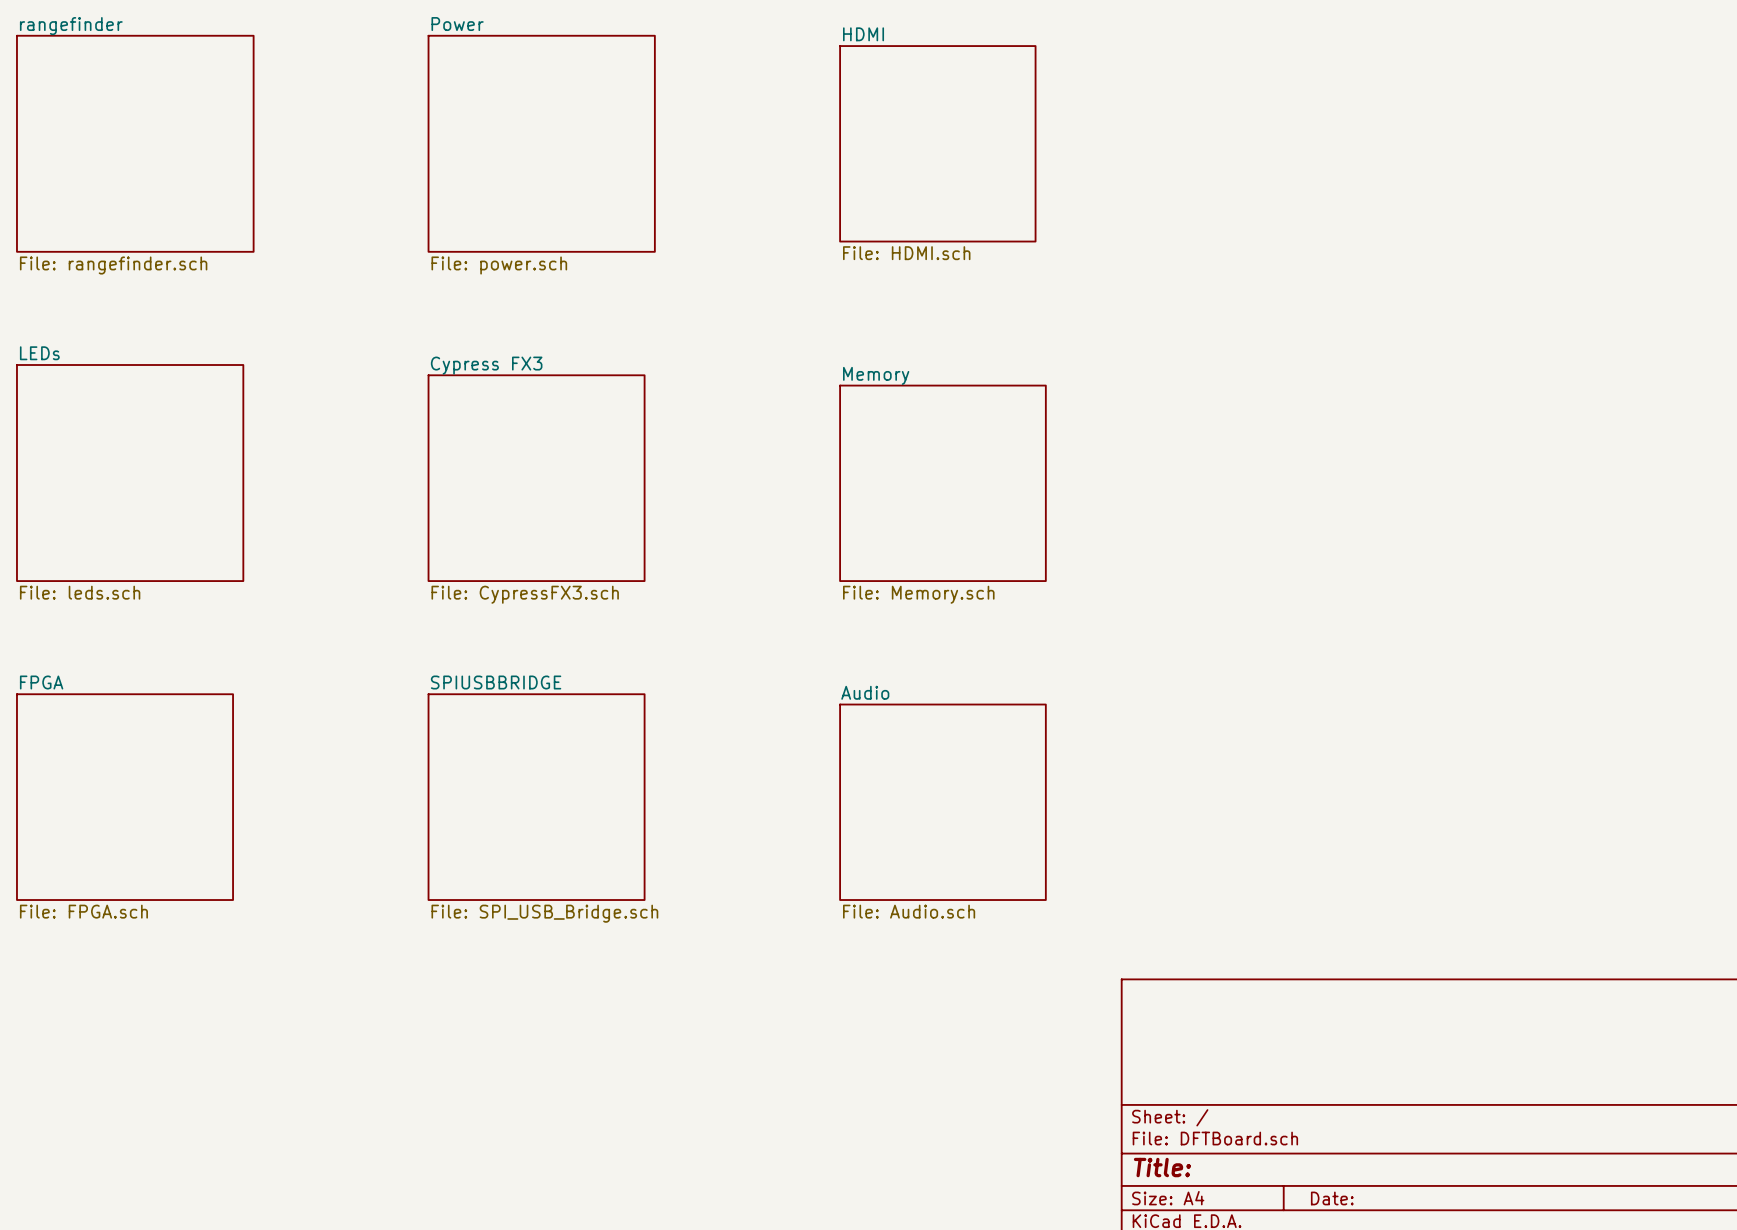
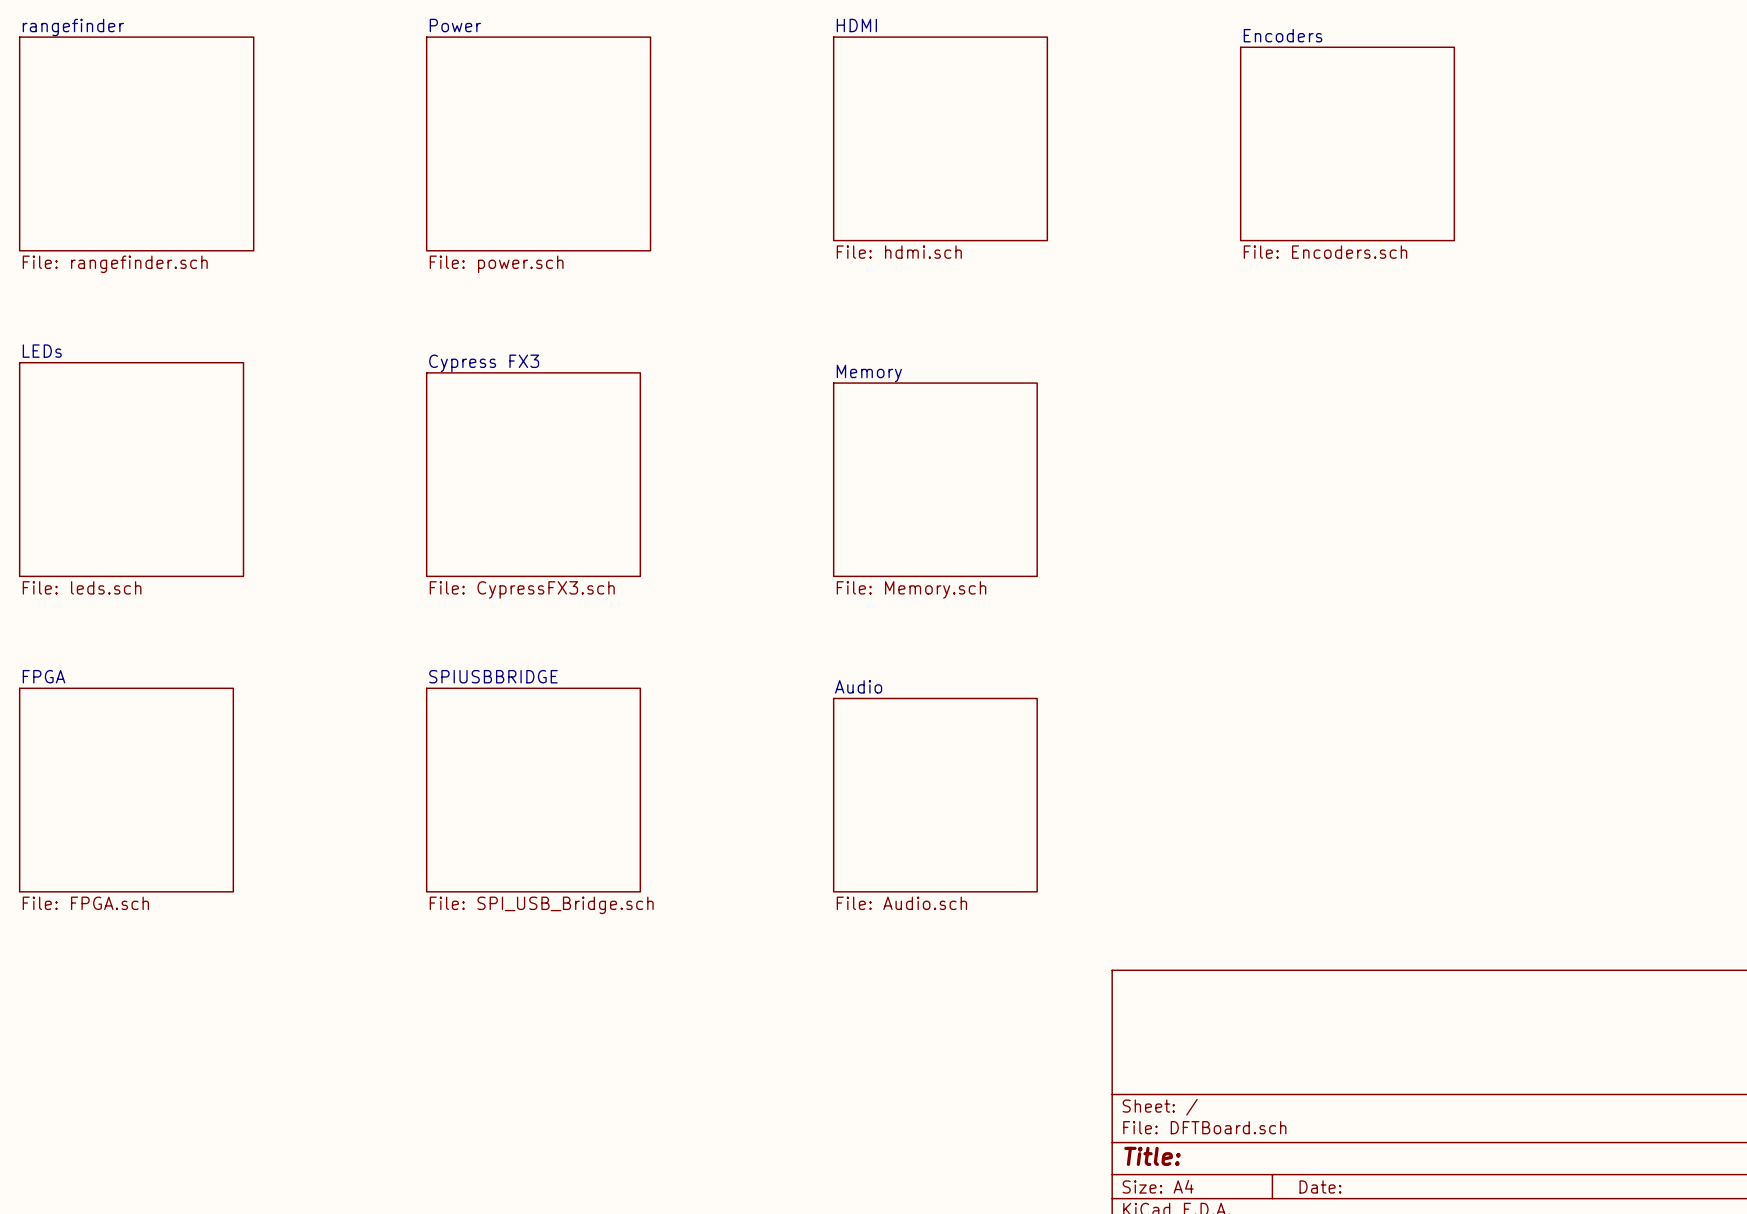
sheet HDMI: none -> File: hdmi.sch (940, 138)
sheet HDMI: File: HDMI.sch (937, 143) -> none
sheet Encoders: none -> File: Encoders.sch (1347, 143)

